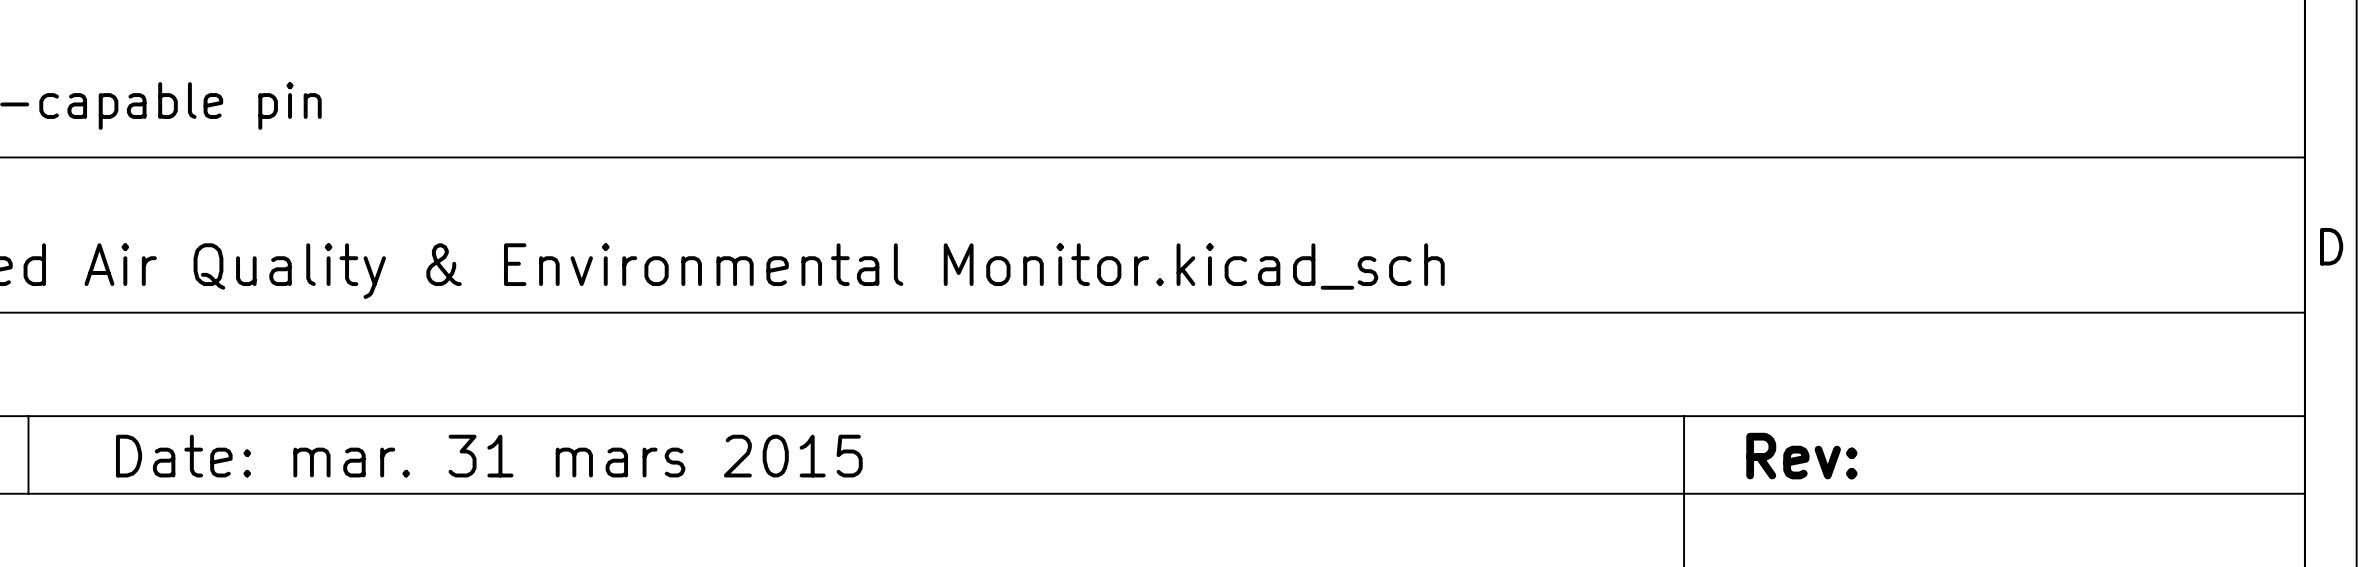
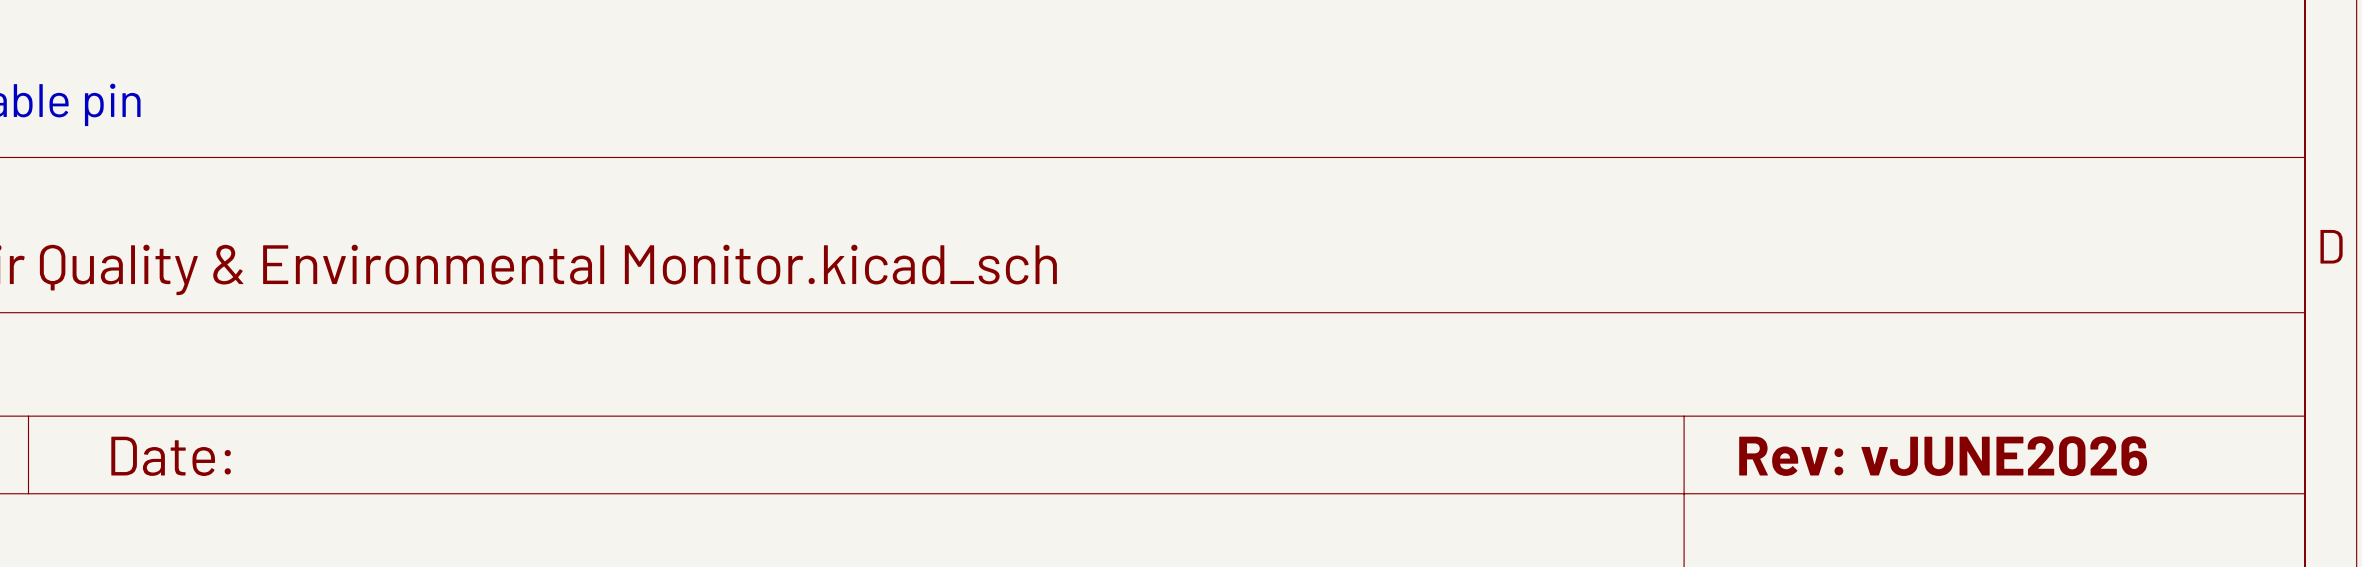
title block: Date: mar. 31 mars 2015 (489, 456) -> Date: (171, 456)
title block: Rev: (1801, 456) -> Rev: vJUNE2026 (1943, 456)

